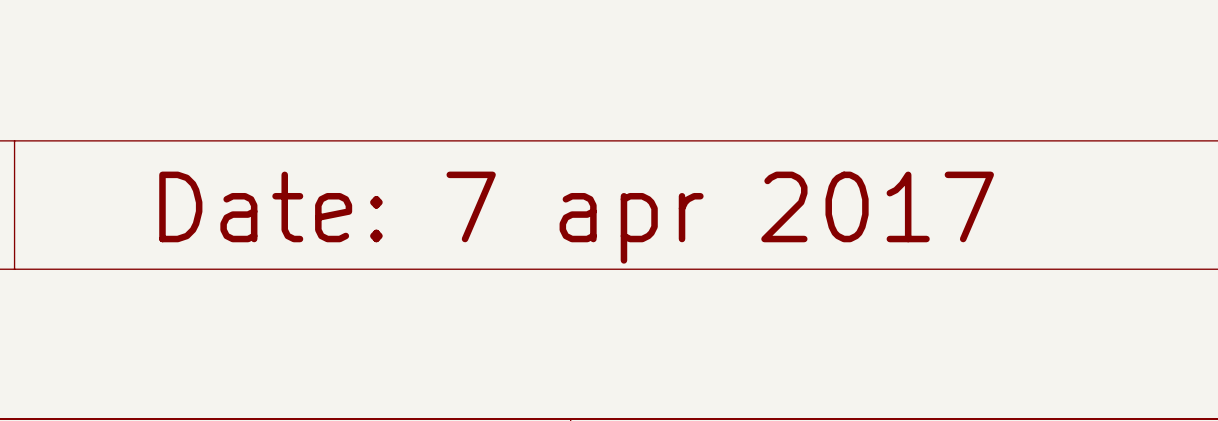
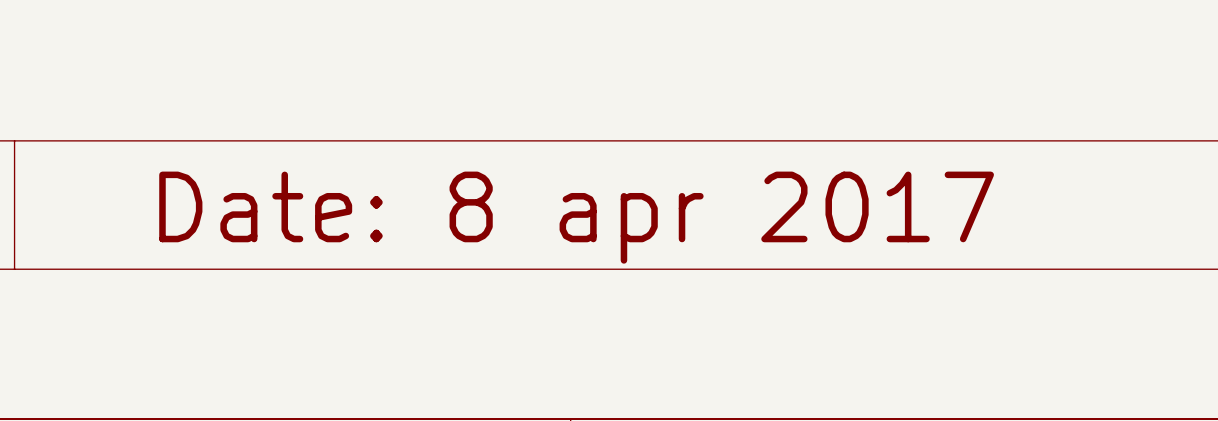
title block: Date: 7 apr 2017 (576, 217) -> Date: 8 apr 2017 (576, 217)

